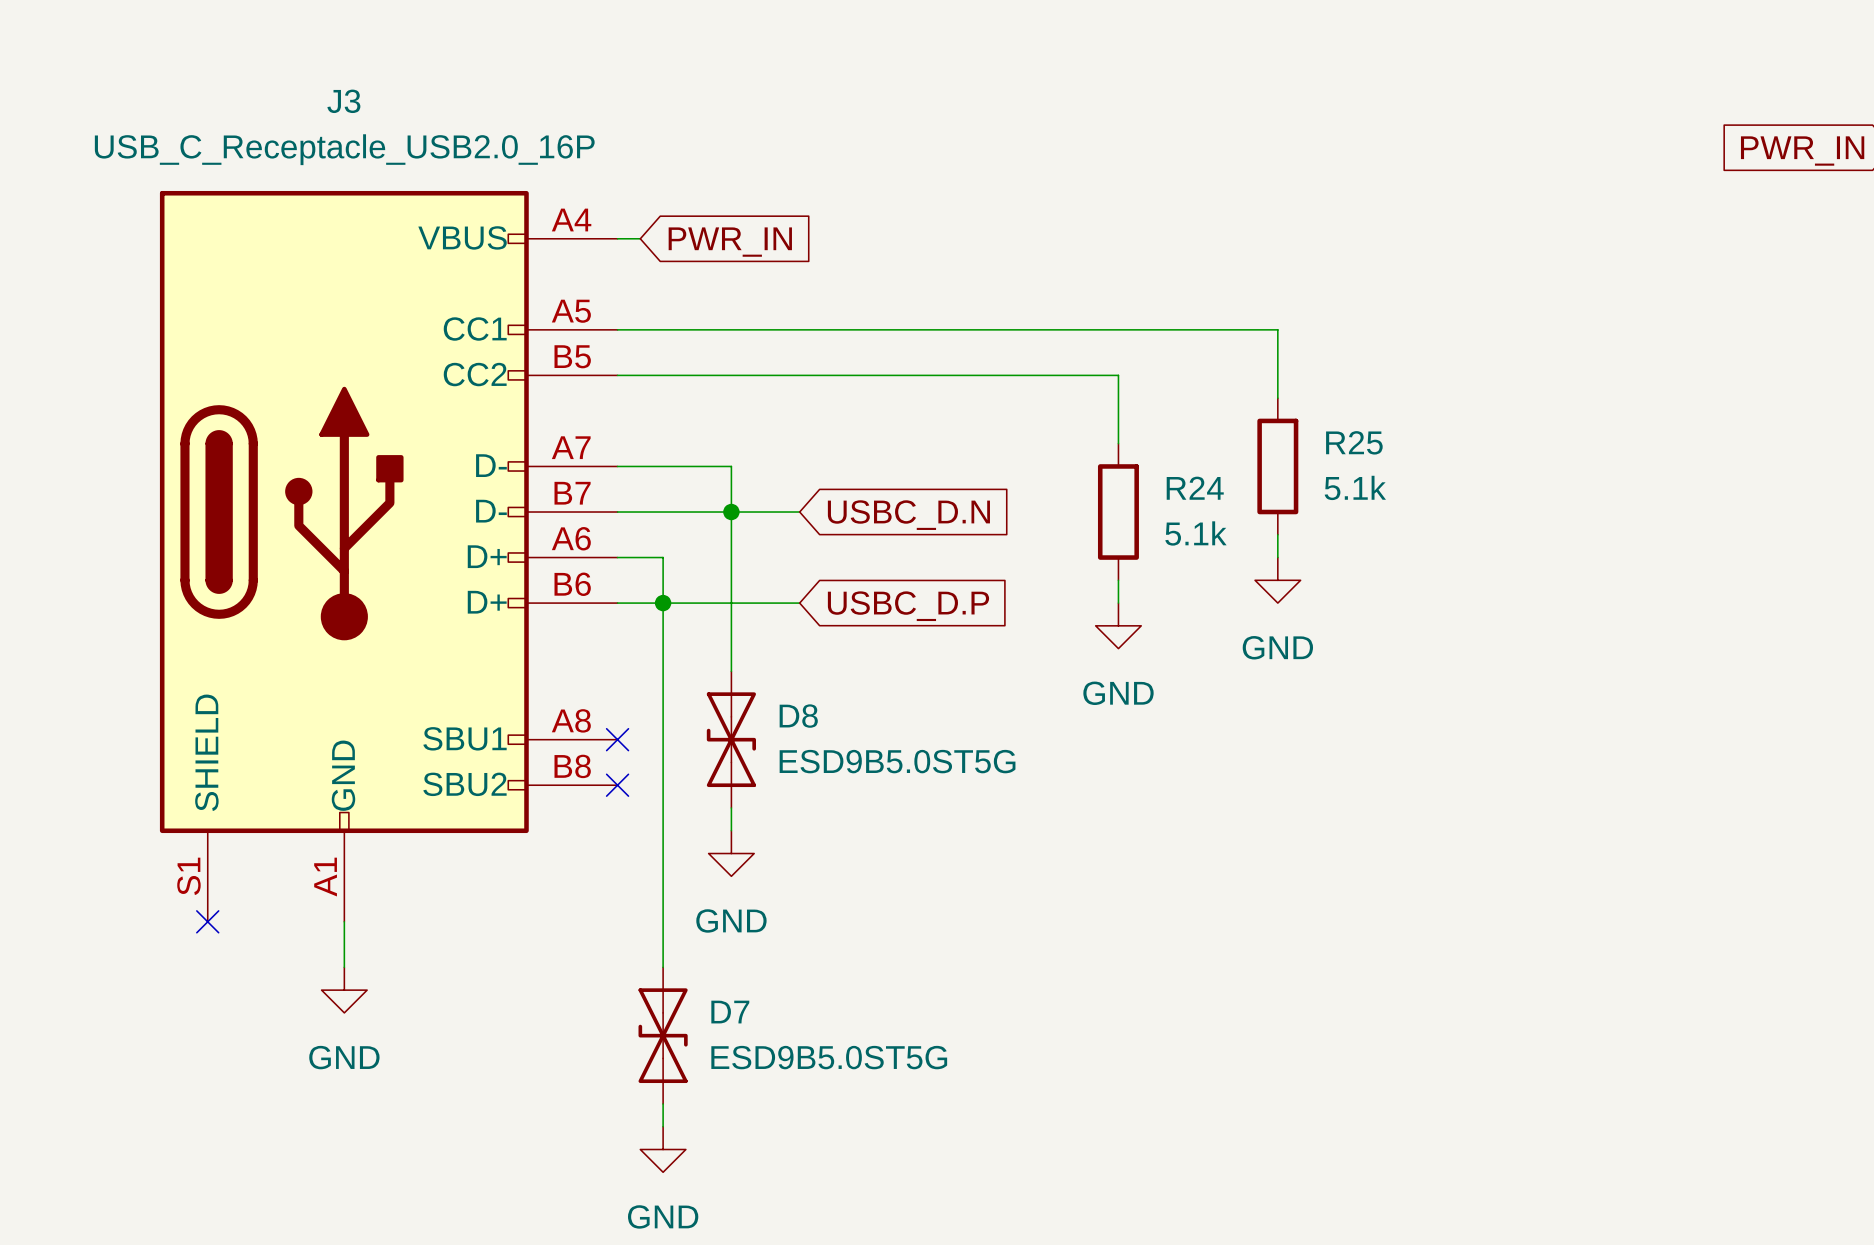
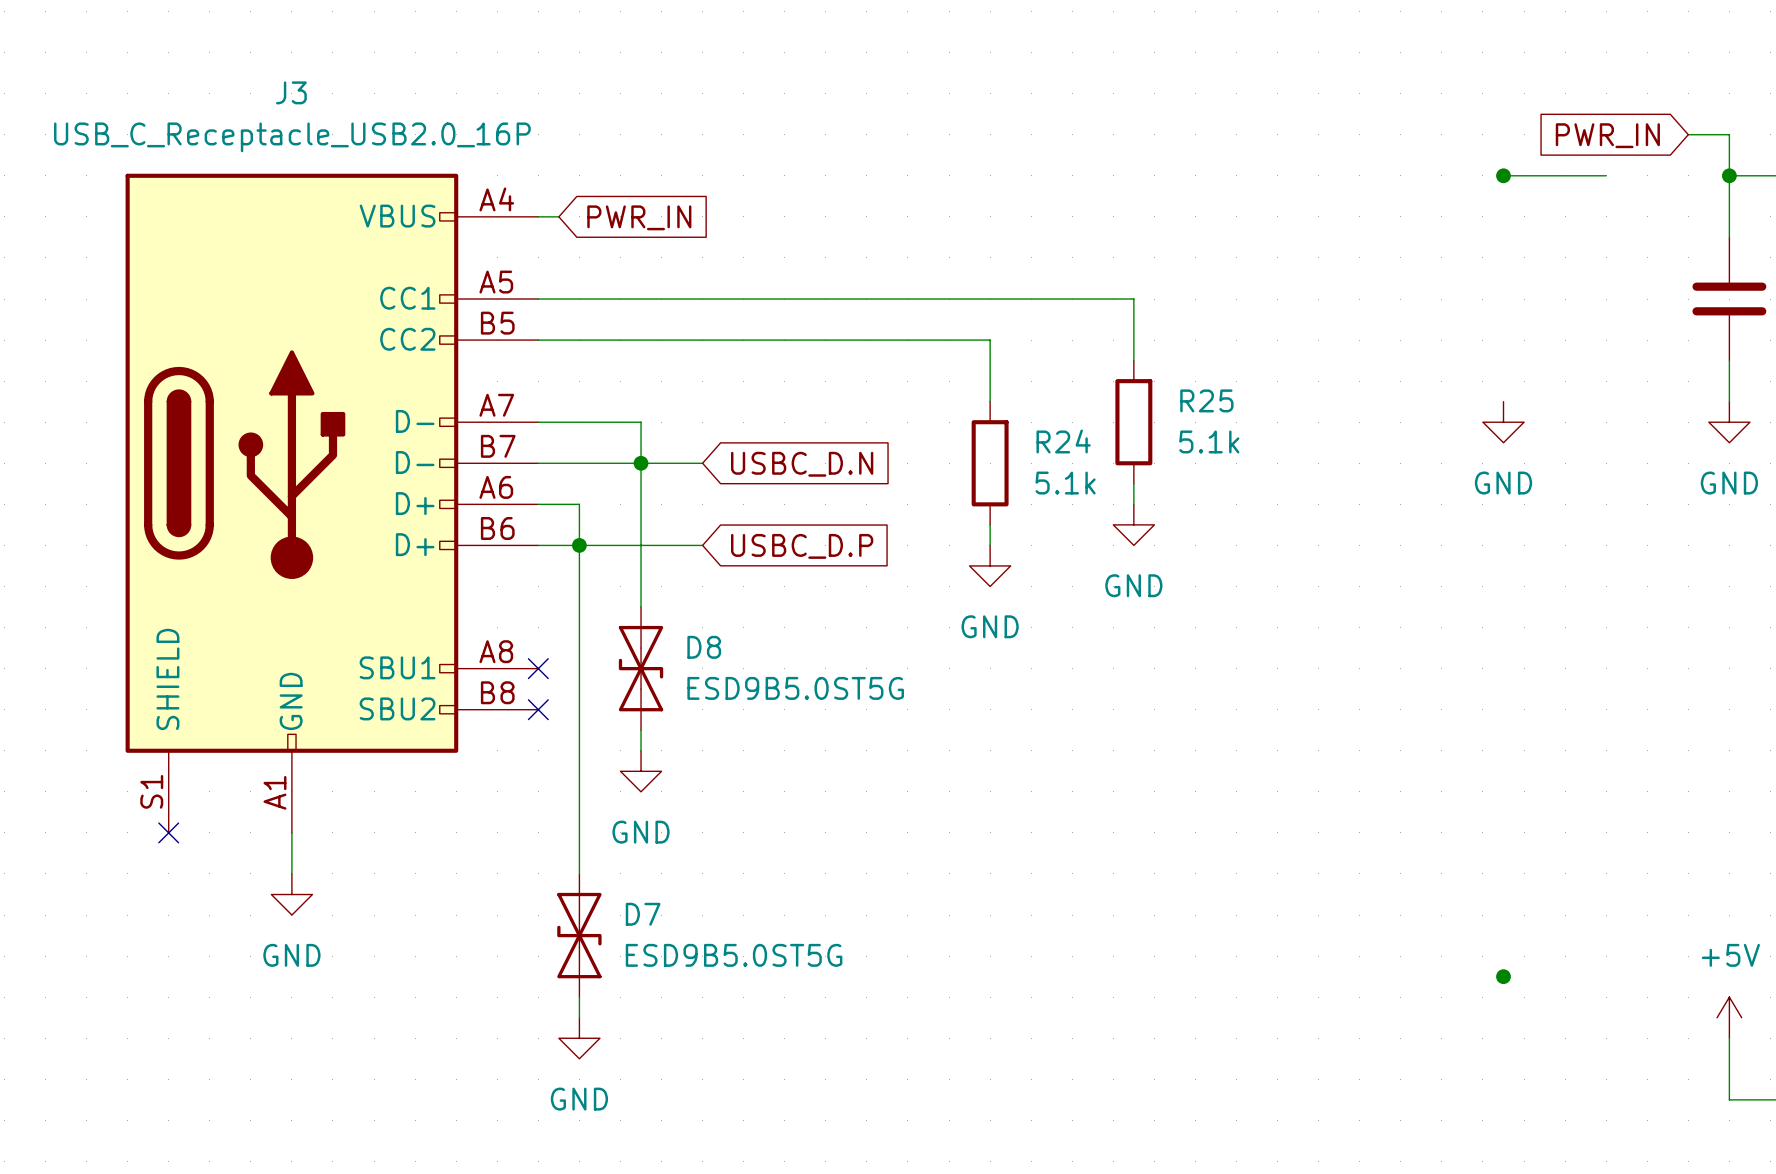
wire: none -> (1503, 175) (1606, 175)
junction: none -> (1503, 175)
power symbol: none -> GND (1503, 422)
junction: none -> (1503, 976)

